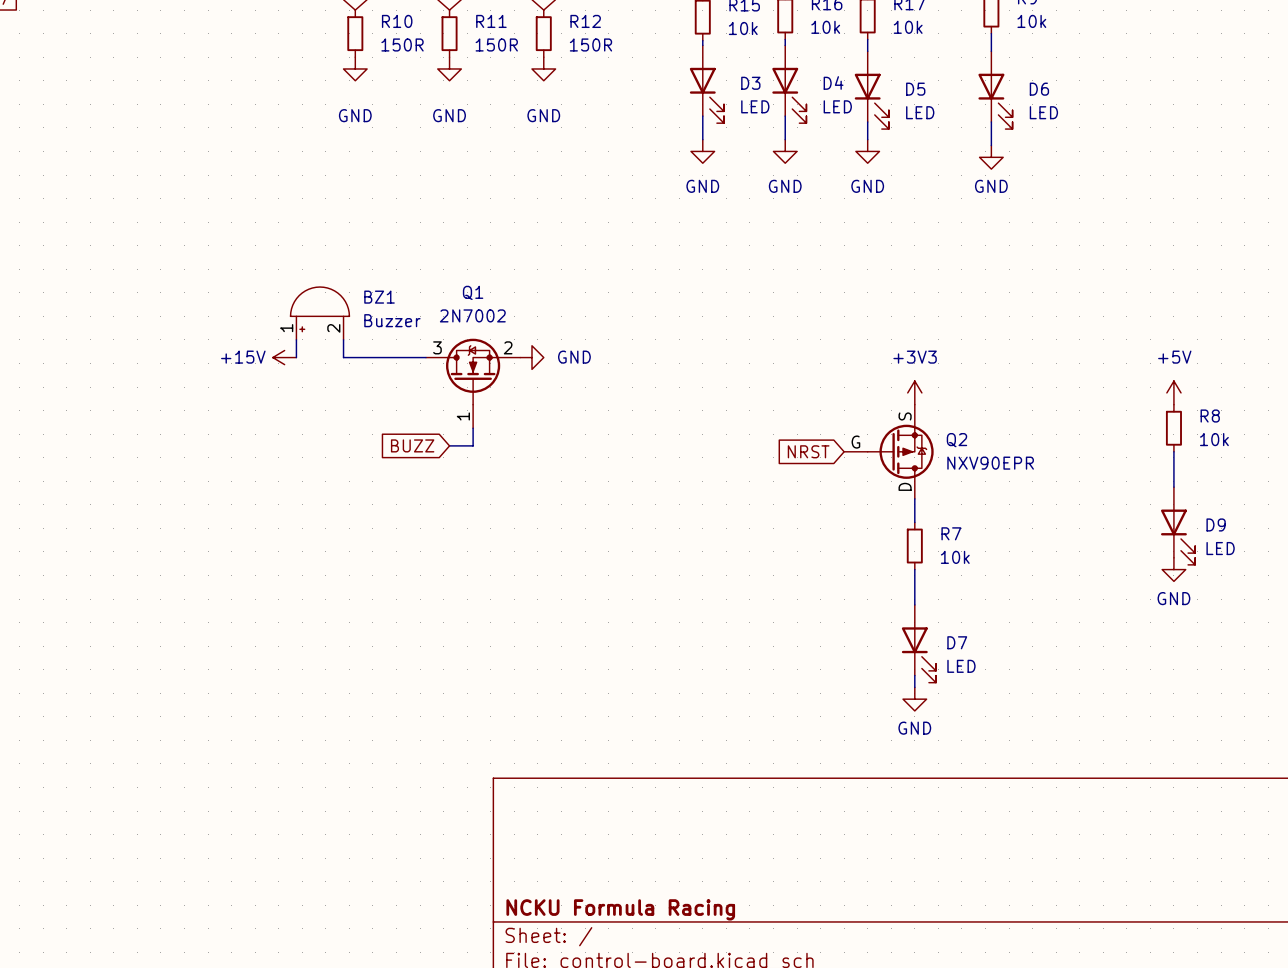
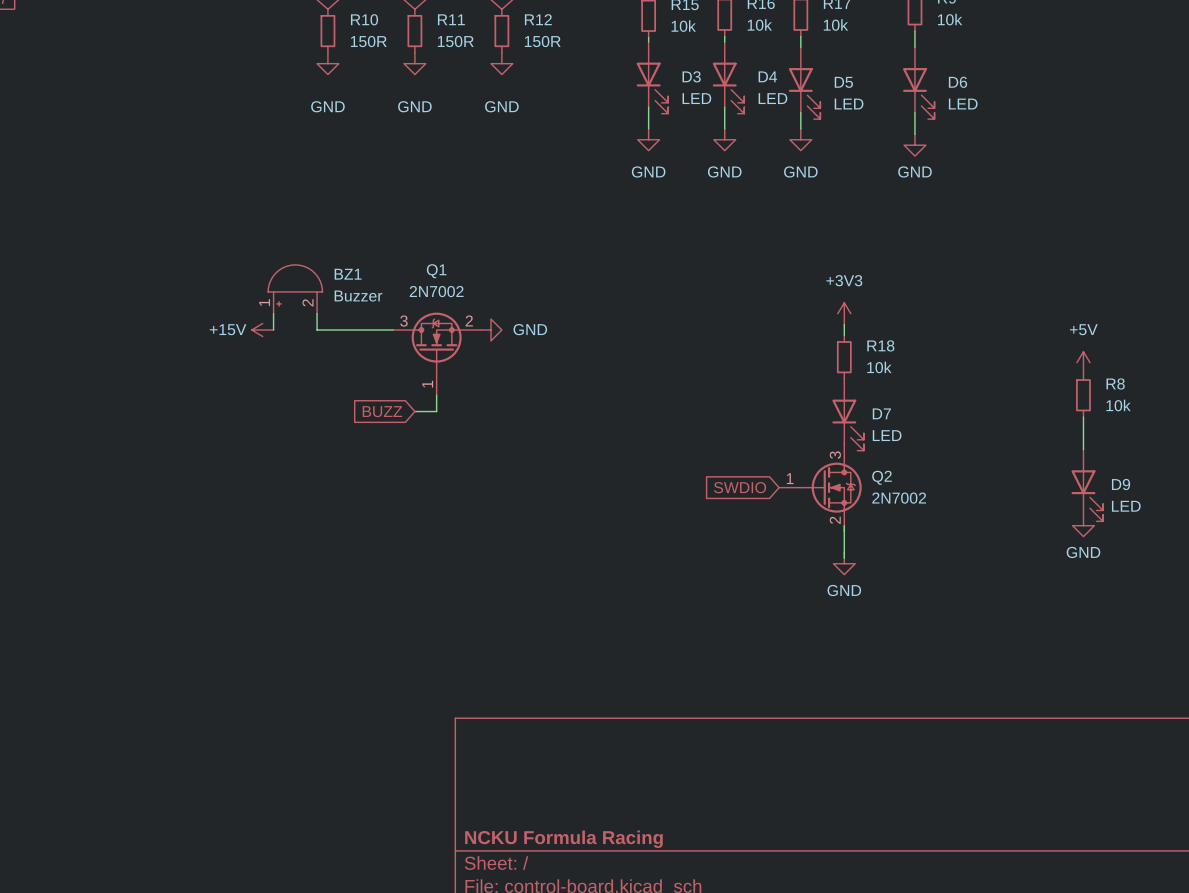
wire: none -> (844, 324) (844, 335)
R18: none -> 10k (844, 357)
power symbol position: +3V3 (914, 392) -> +3V3 (844, 313)
Q2 symbol: [844, 404, 934, 499] -> [779, 444, 862, 532]
global label: NRST (808, 451) -> none
Q2 value: NXV90EPR (990, 463) -> 2N7002 (899, 498)
global label: none -> SWDIO (740, 487)
R7: 10k (914, 546) -> none
D7 position: (918, 643) -> (848, 414)
wire: (914, 675) (914, 687) -> none
power symbol position: GND (914, 699) -> GND (844, 563)

